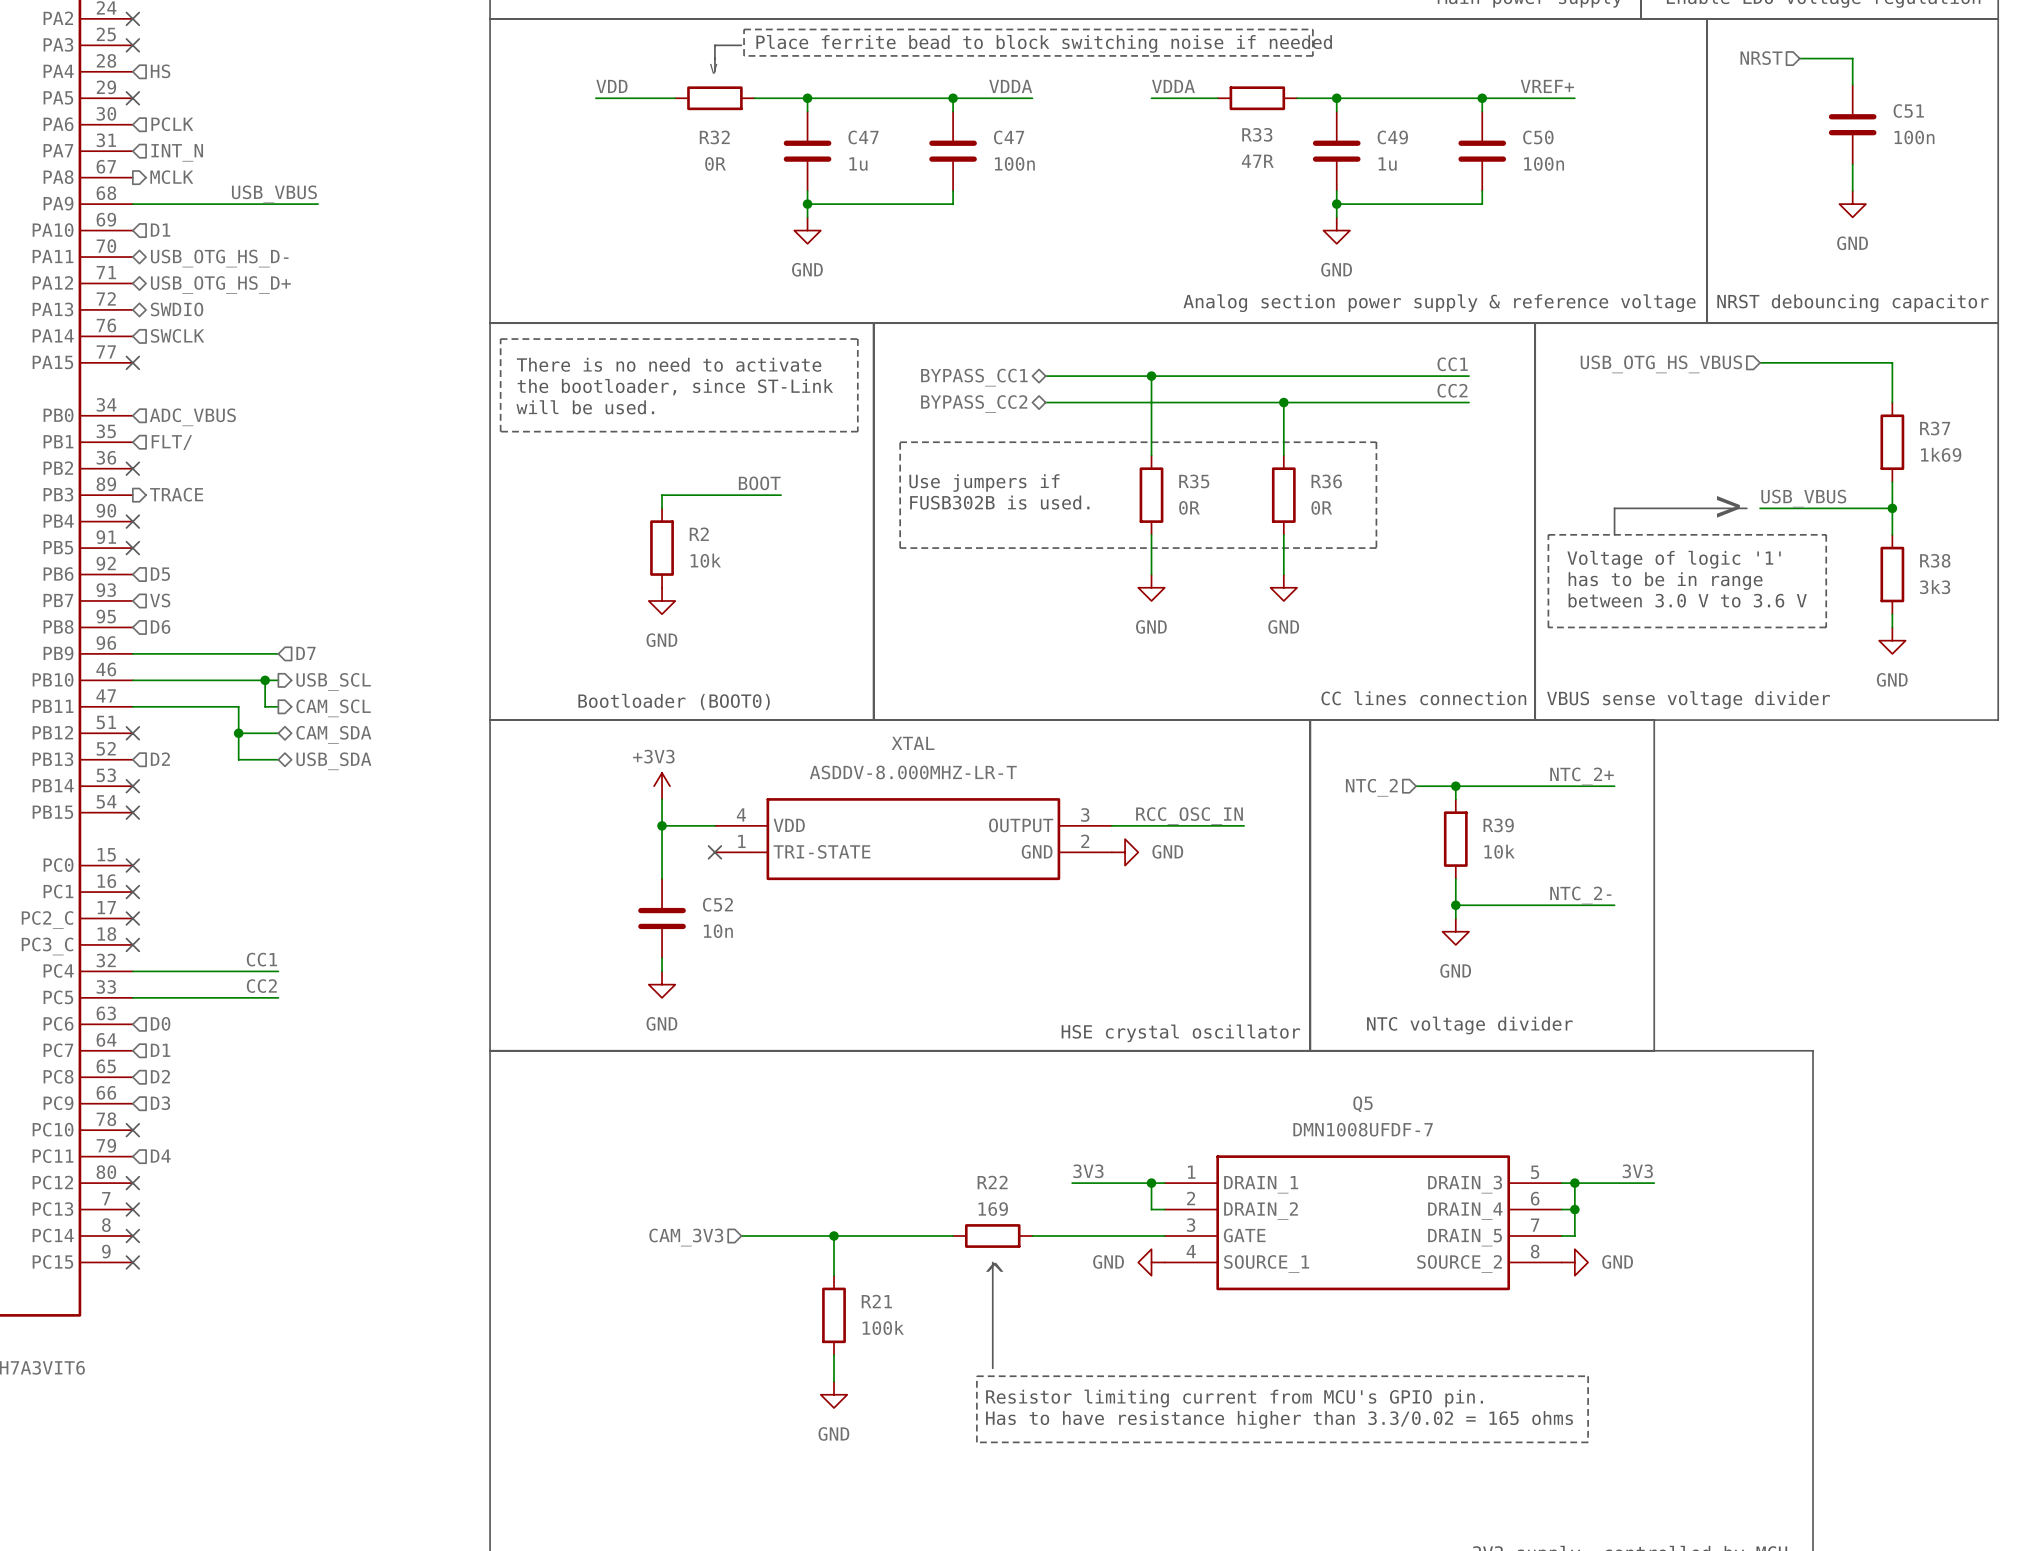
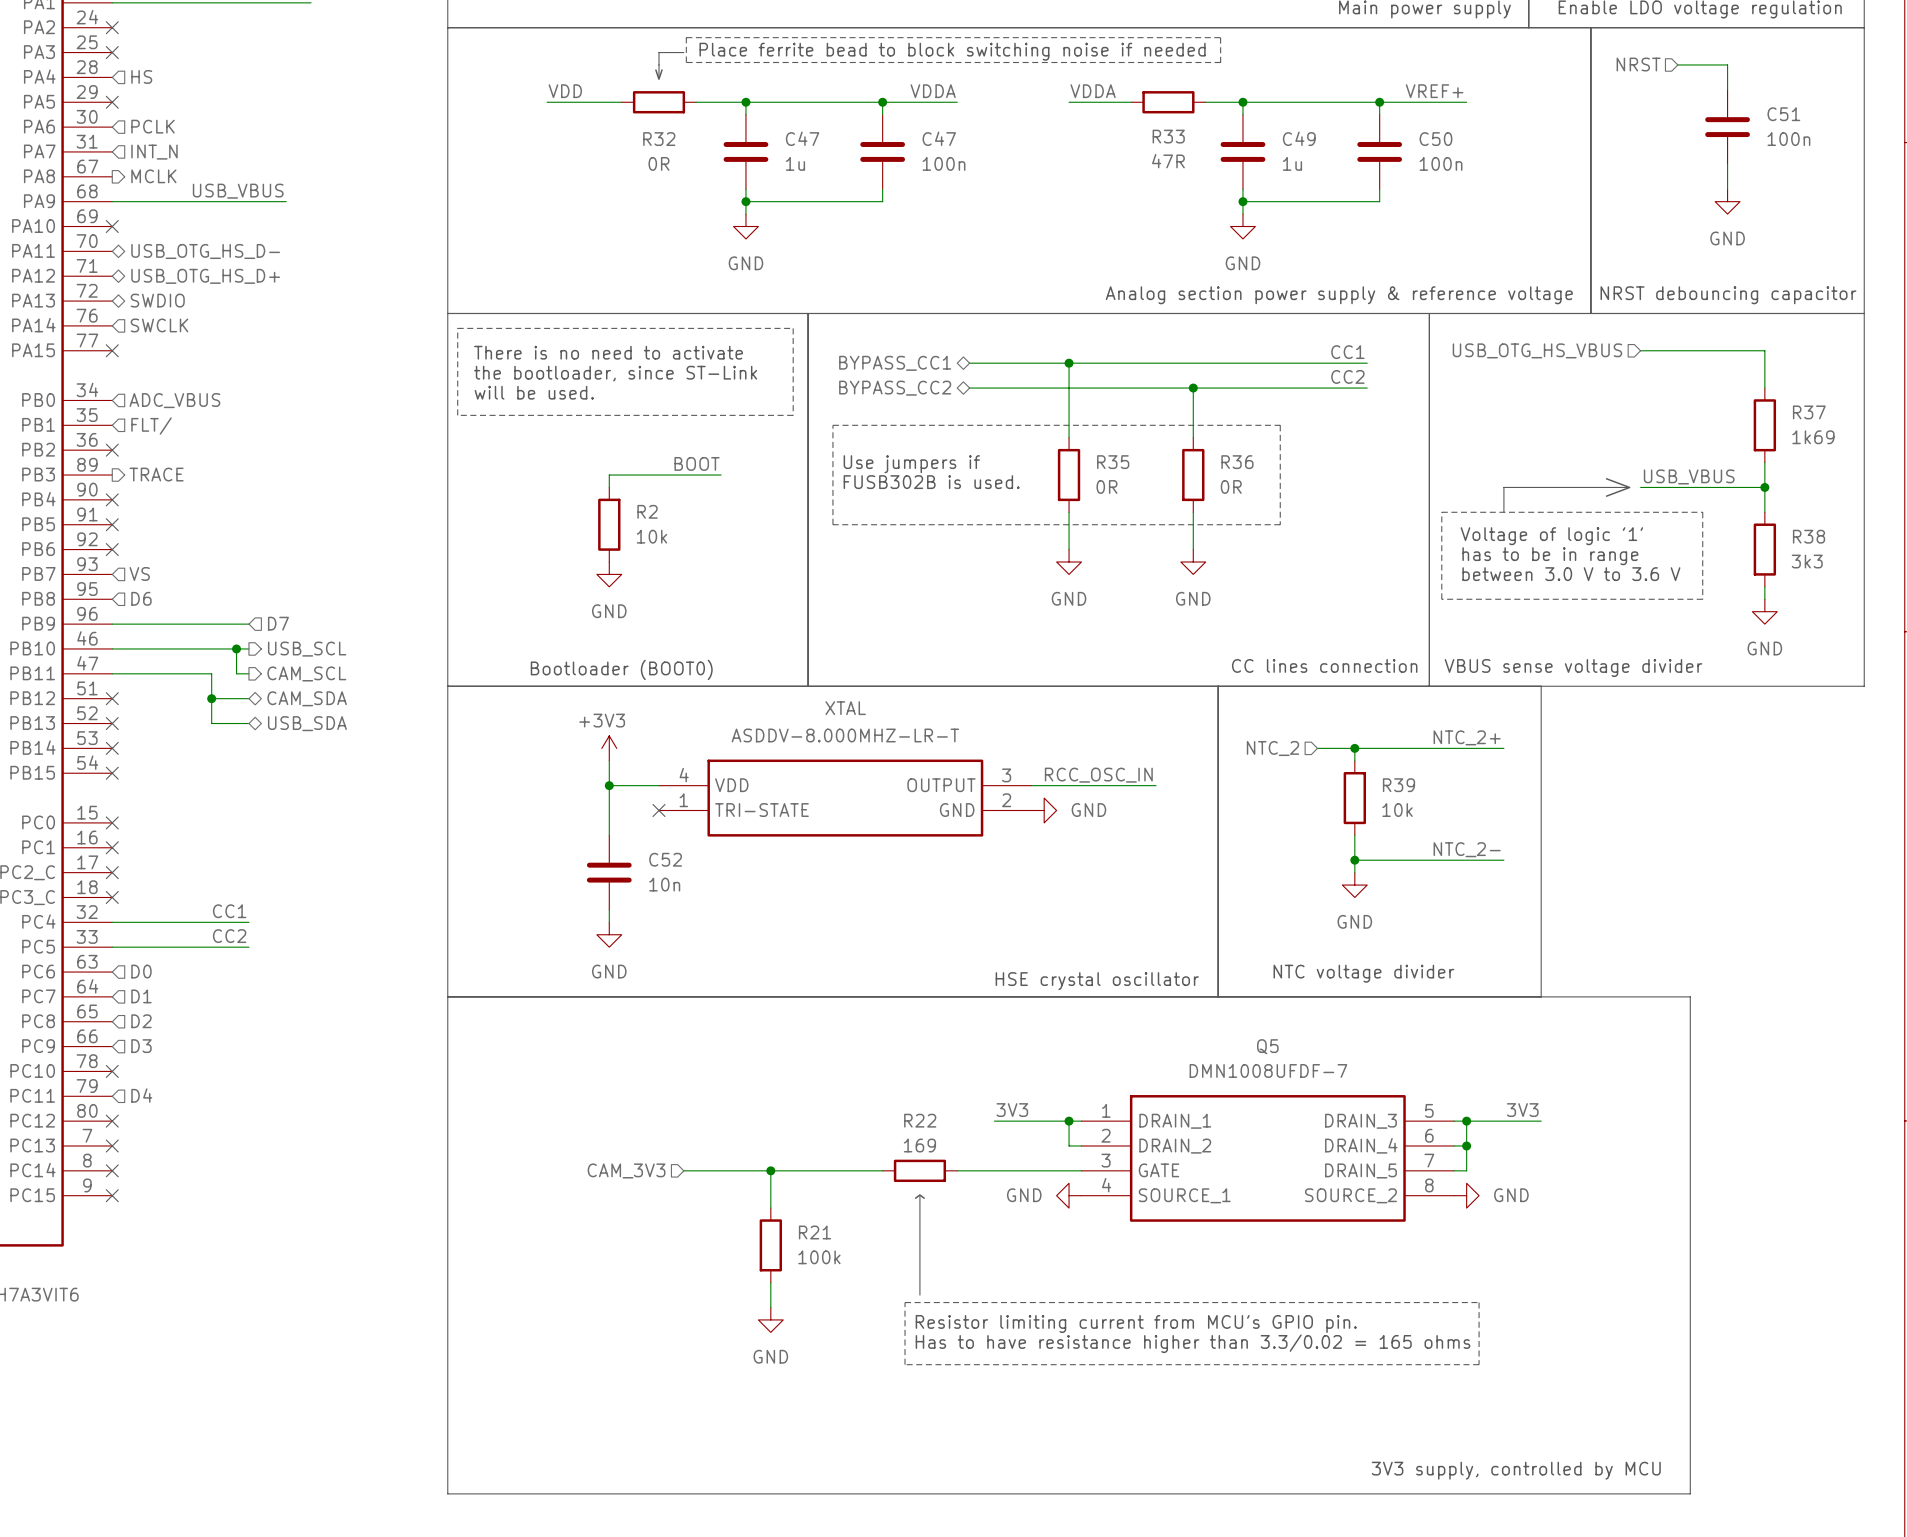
no-connect mark: none -> (112, 226)
hierarchical label: D1 (160, 230) -> none
no-connect mark: none -> (112, 549)
hierarchical label: D5 (160, 574) -> none
no-connect mark: none -> (112, 723)
hierarchical label: D2 (160, 759) -> none

